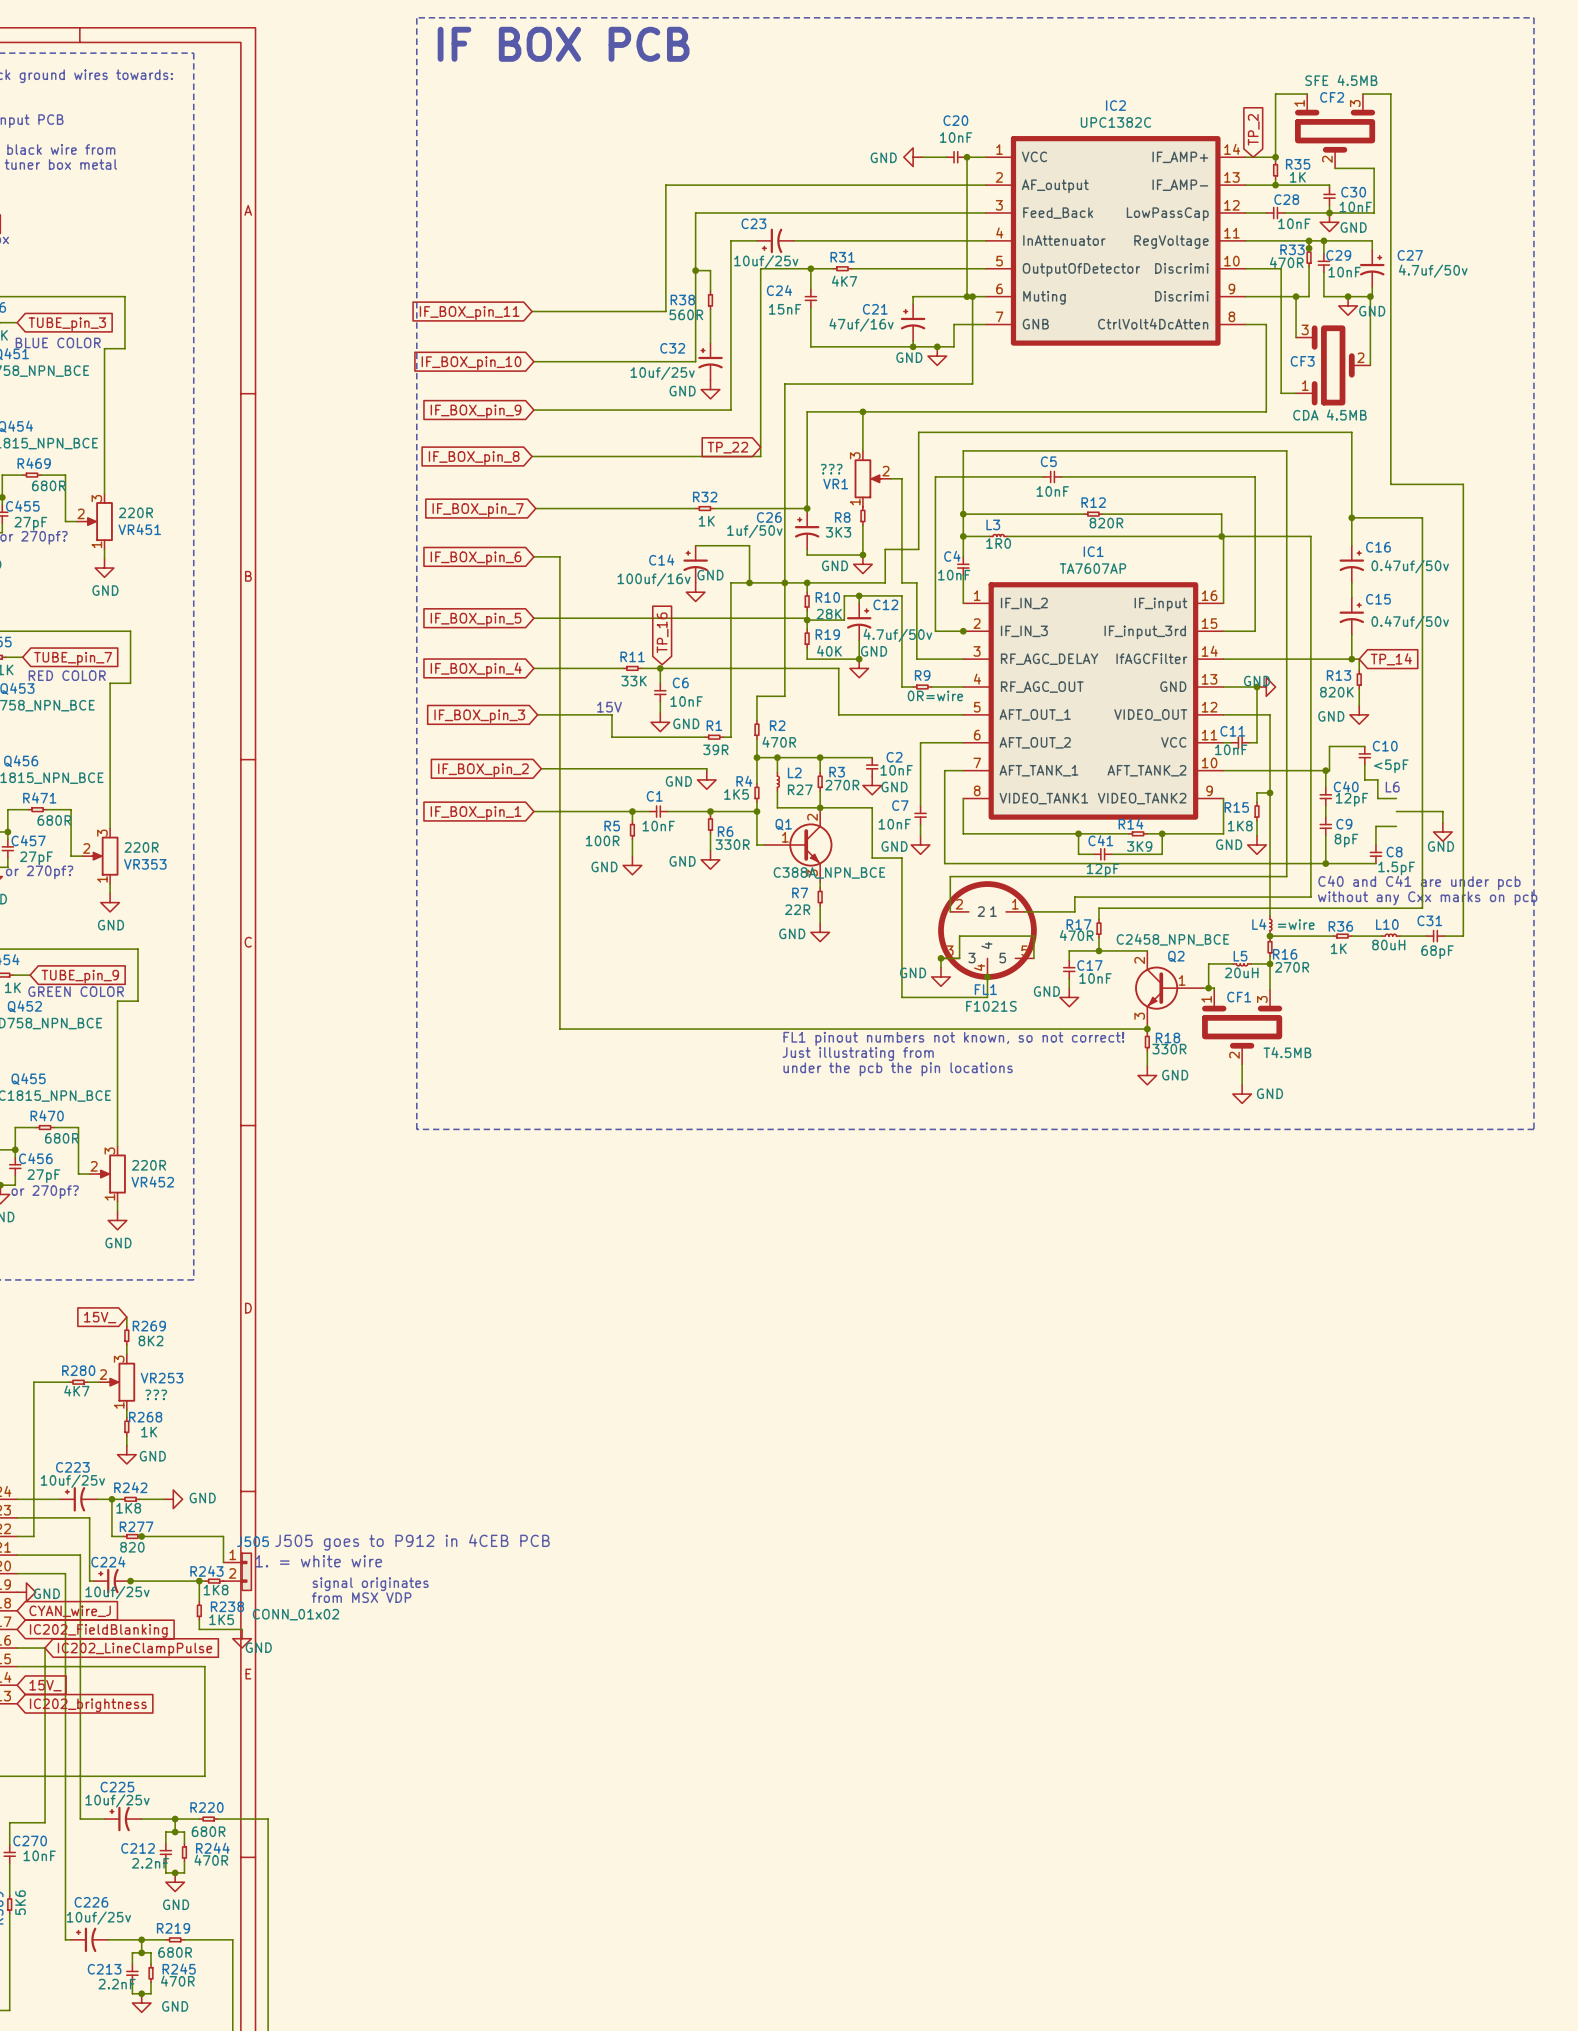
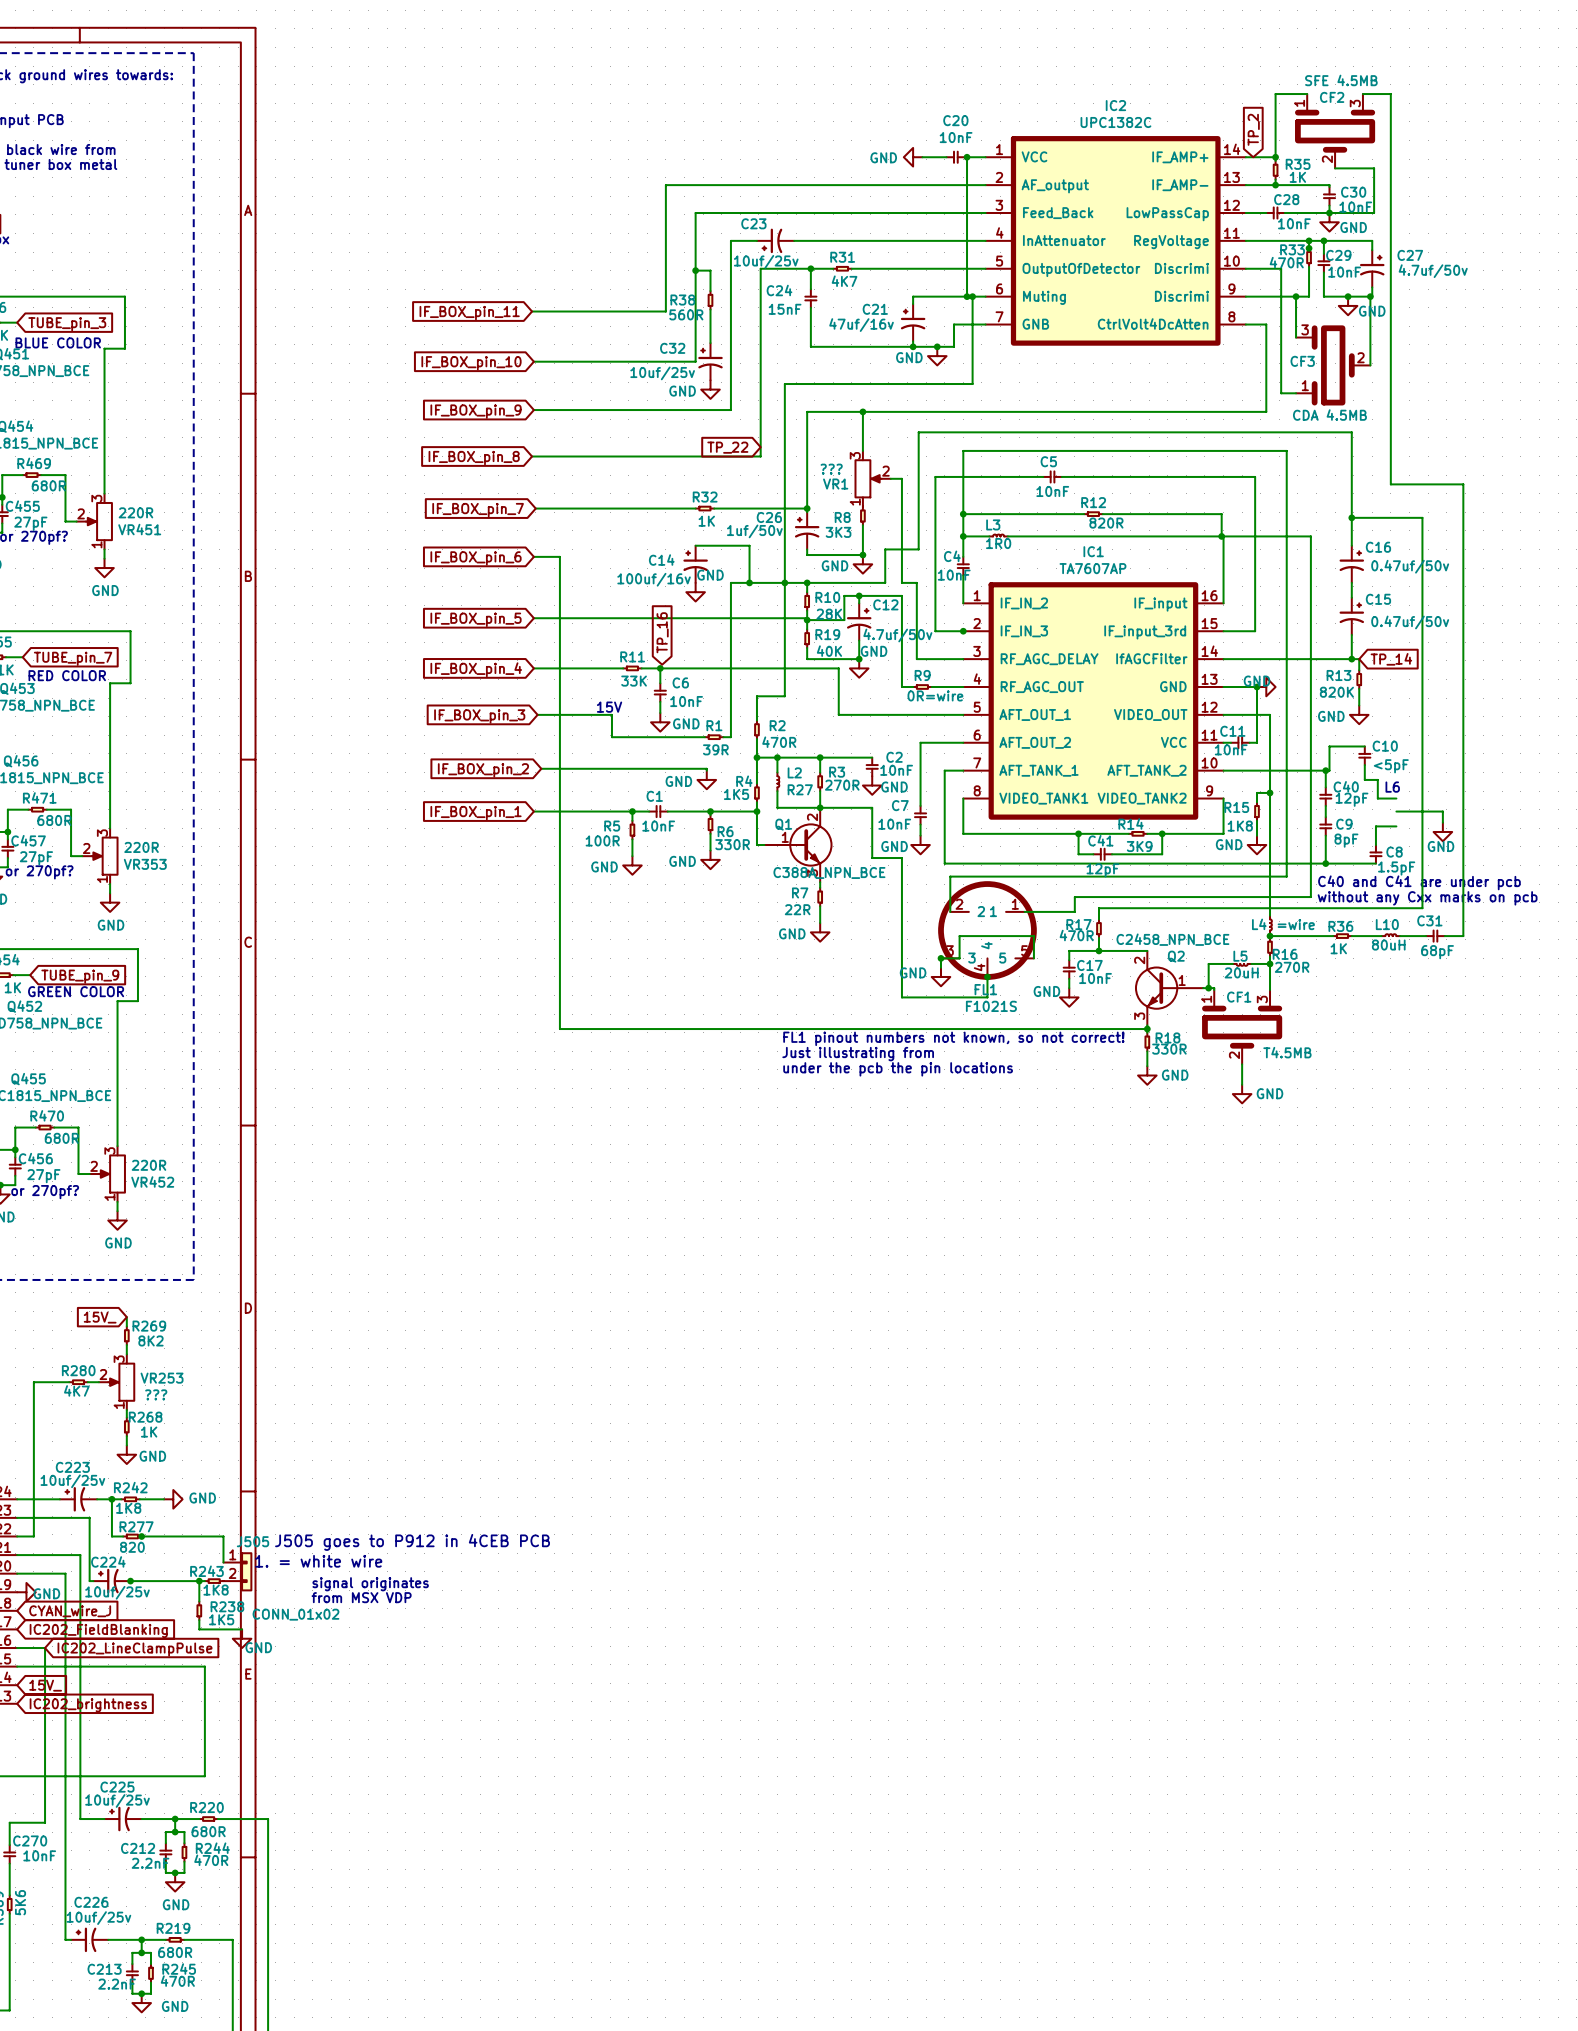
line: (416, 17) (416, 1129) (1533, 1129) (1533, 17) (418, 17) -> none
text: IF BOX PCB (563, 44) -> none

